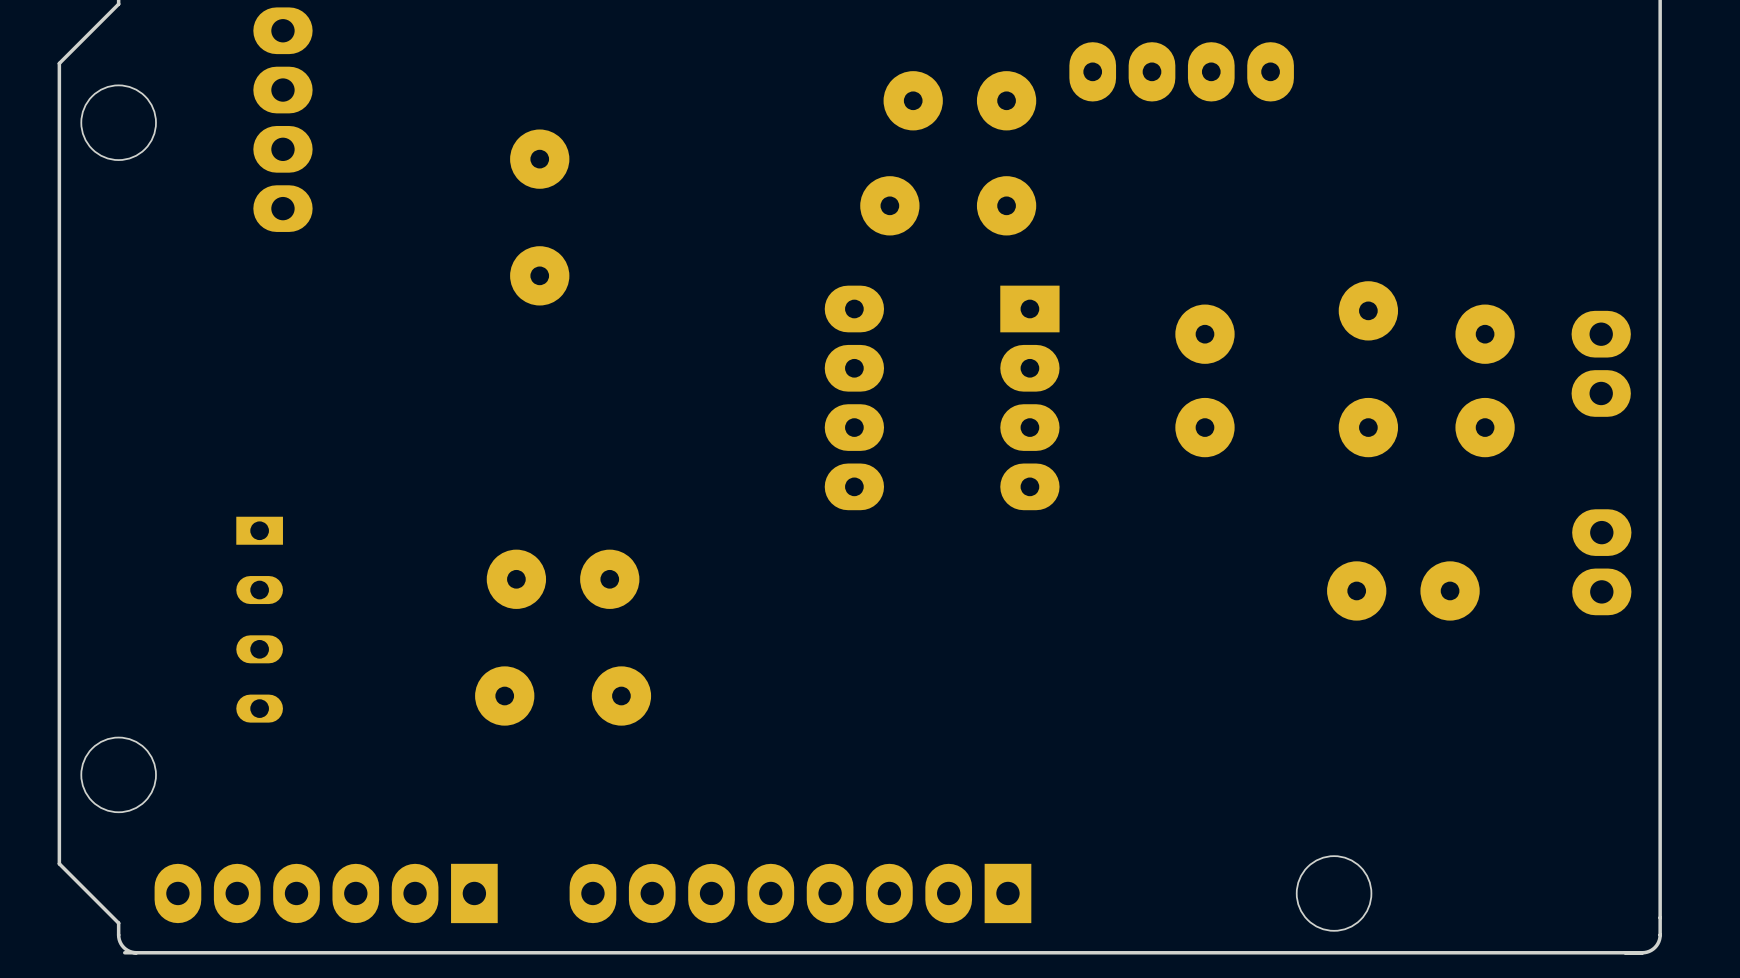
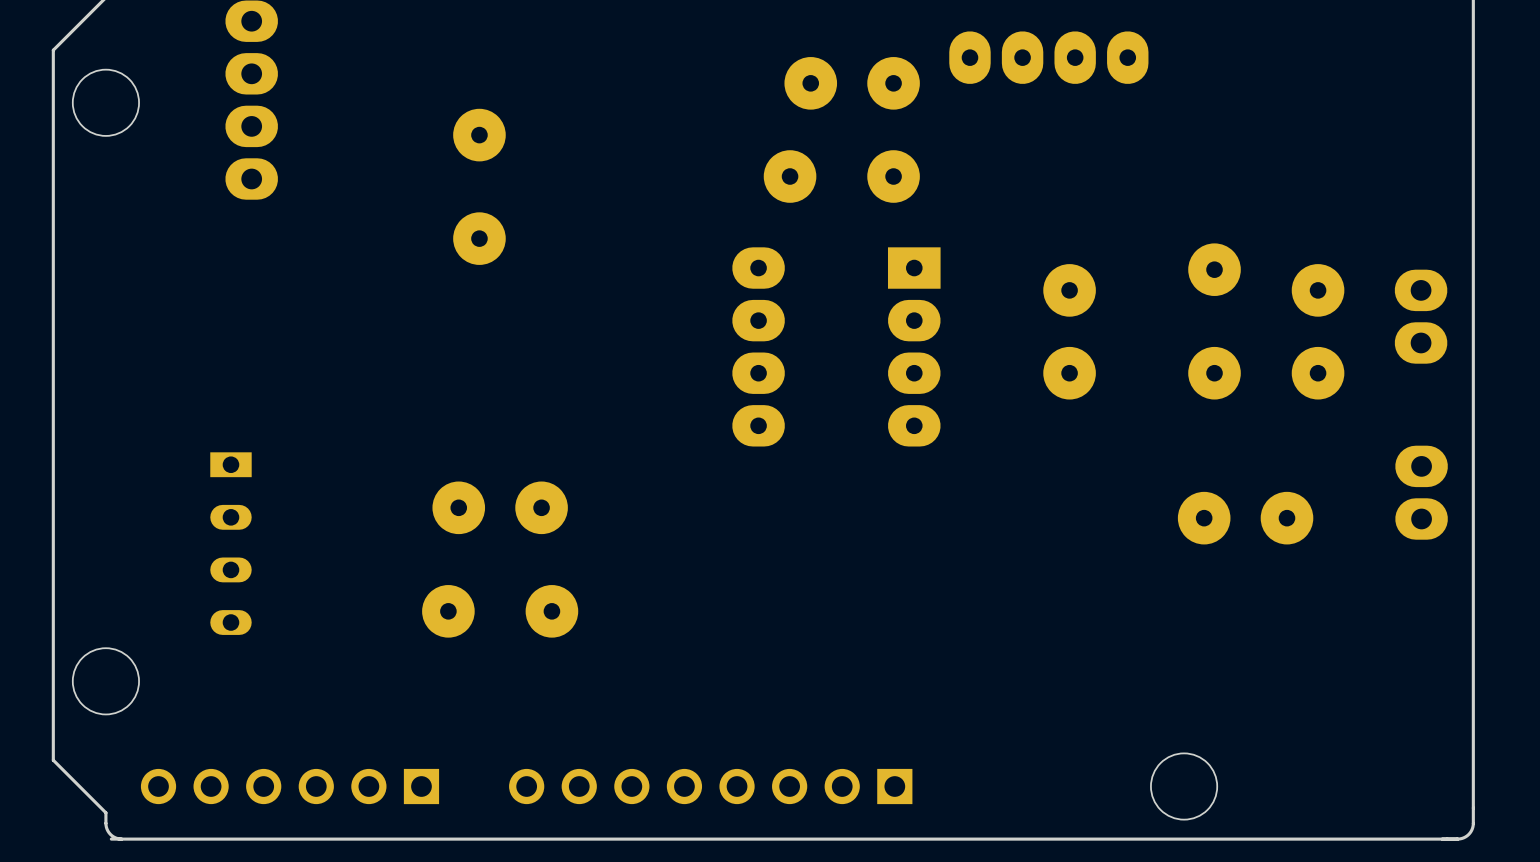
part footprint: [154, 863, 498, 924] -> [140, 768, 440, 805]
part footprint: [569, 863, 1032, 924] -> [509, 768, 913, 805]

